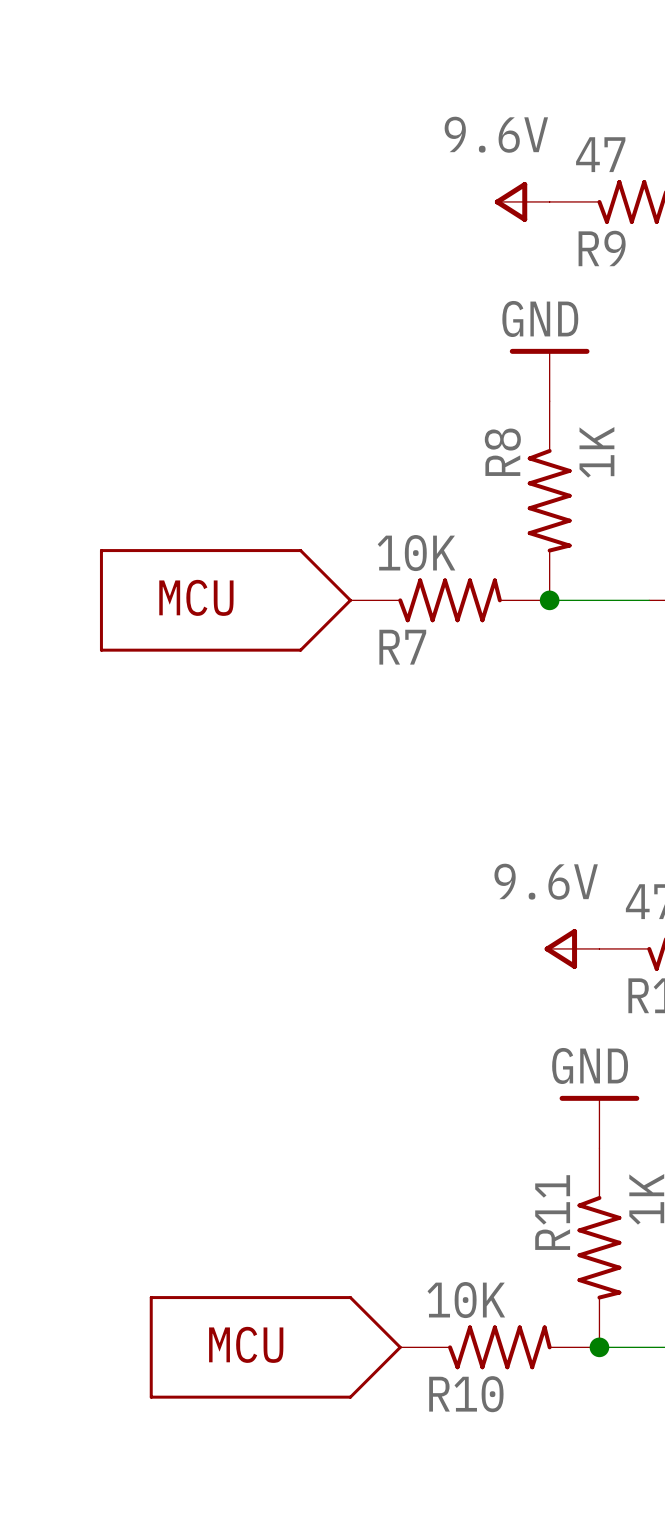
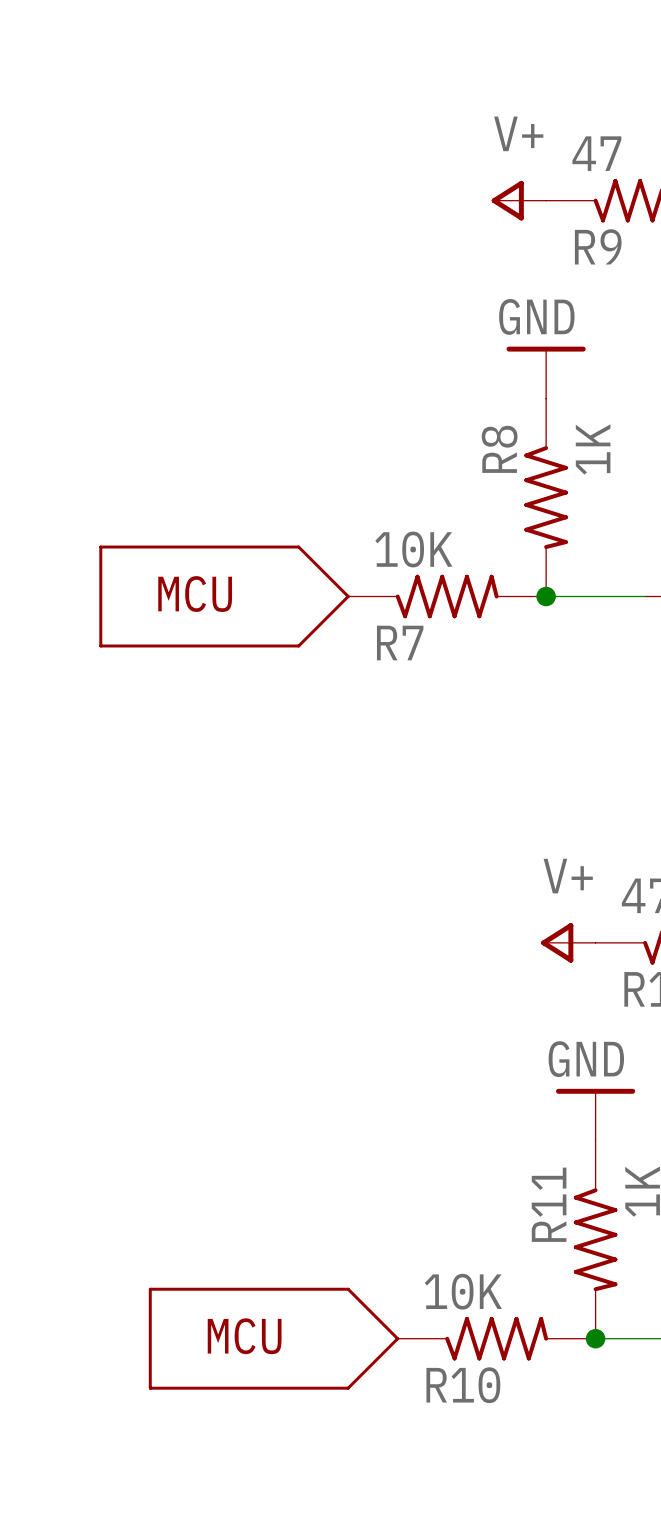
power symbol: 9.6V (522, 201) -> V+ (518, 200)
power symbol: 9.6V (572, 948) -> V+ (568, 942)

